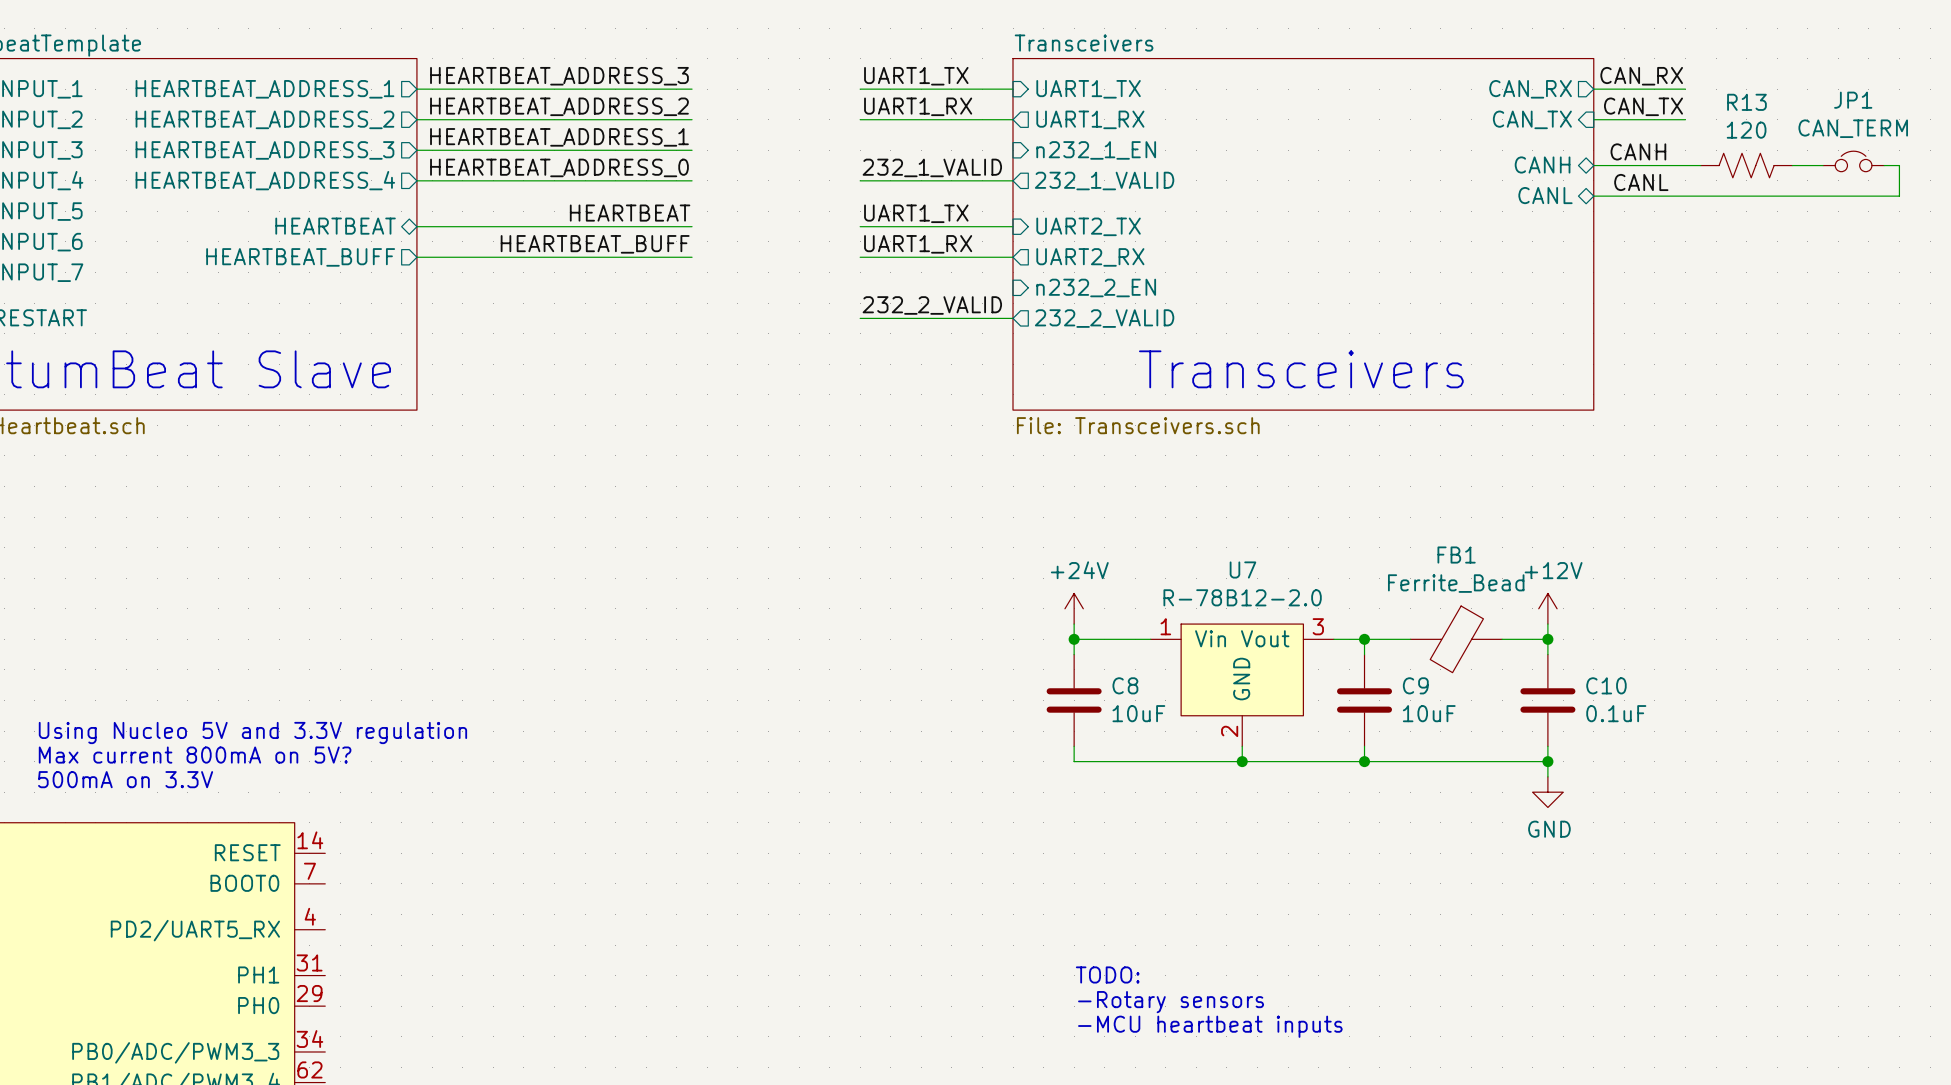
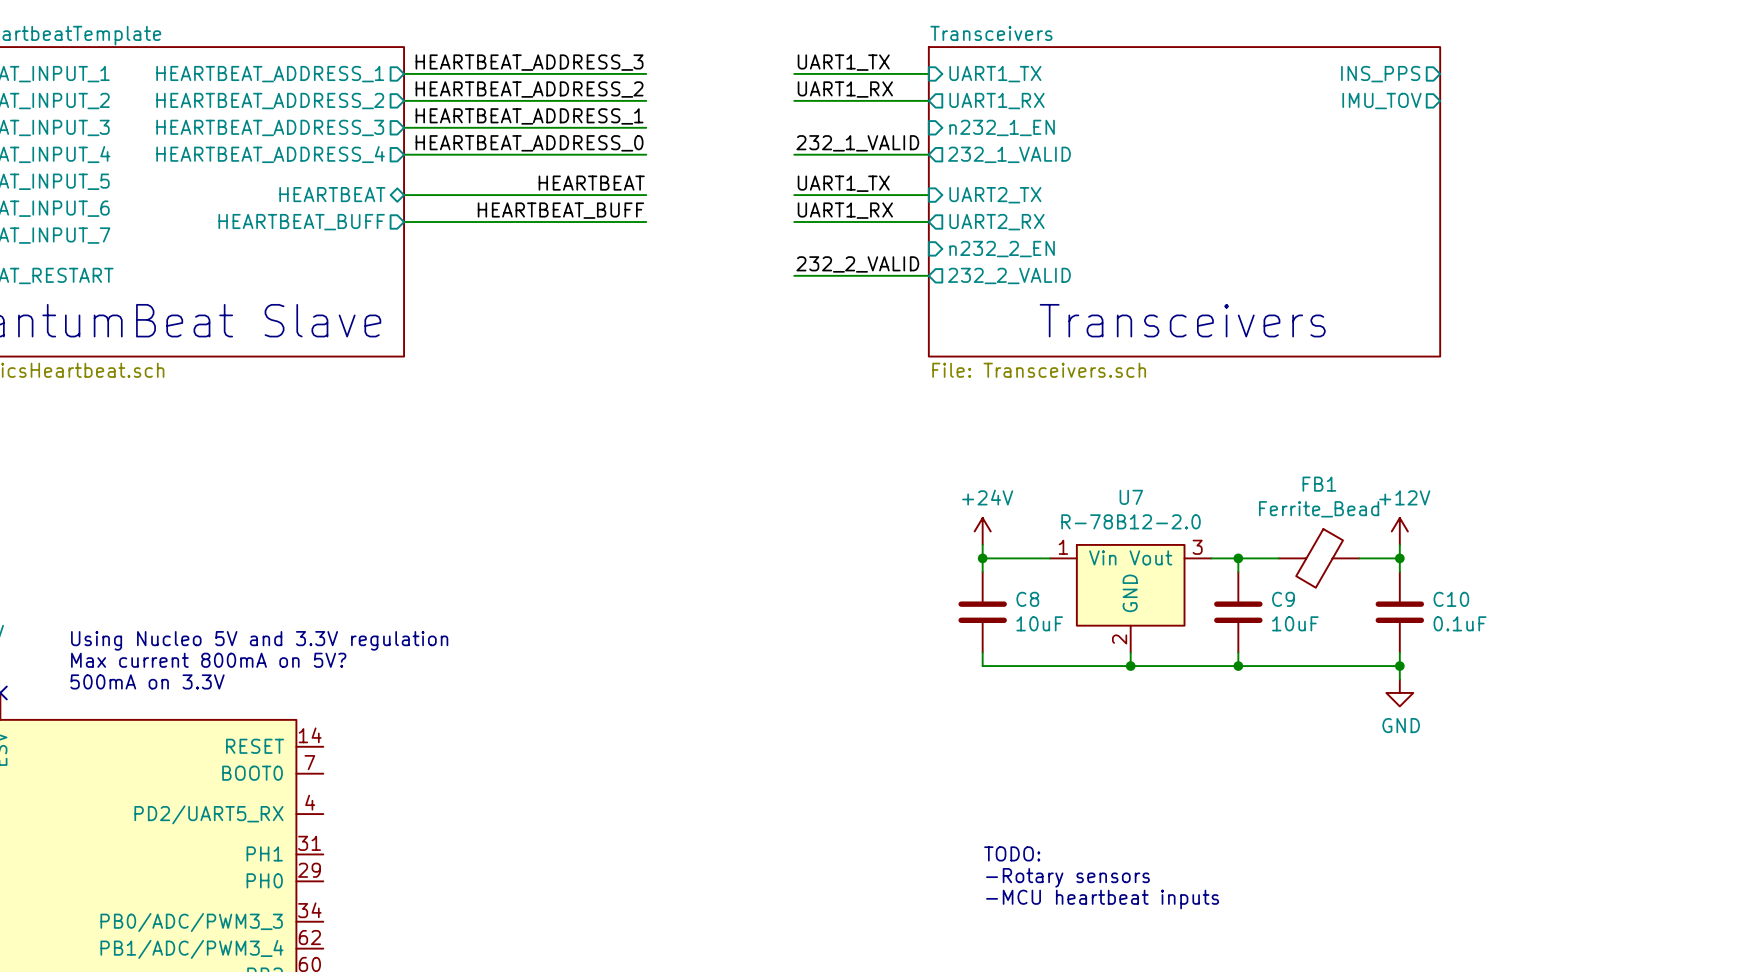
label: CAN_RX (1641, 76) -> none
sheet pin: CAN_RX (1530, 89) -> INS_PPS (1380, 74)
wire: (1593, 89) (1685, 89) -> none
label: CAN_TX (1643, 106) -> none
sheet pin shape: input (1532, 119) -> output (1381, 101)
sheet pin: CAN_TX (1532, 119) -> IMU_TOV (1381, 101)
wire: (1593, 119) (1685, 119) -> none
label: CANH (1638, 151) -> none
JP1: CAN_TERM (1853, 161) -> none
sheet pin: CANH (1542, 164) -> none
wire: (1593, 165) (1700, 165) -> none
R13: 120 (1746, 165) -> none
wire: (1792, 165) (1823, 165) -> none
wire: (1884, 165) (1899, 165) (1899, 196) (1593, 196) -> none
label: CANL (1641, 182) -> none
sheet pin: CANL (1545, 195) -> none

